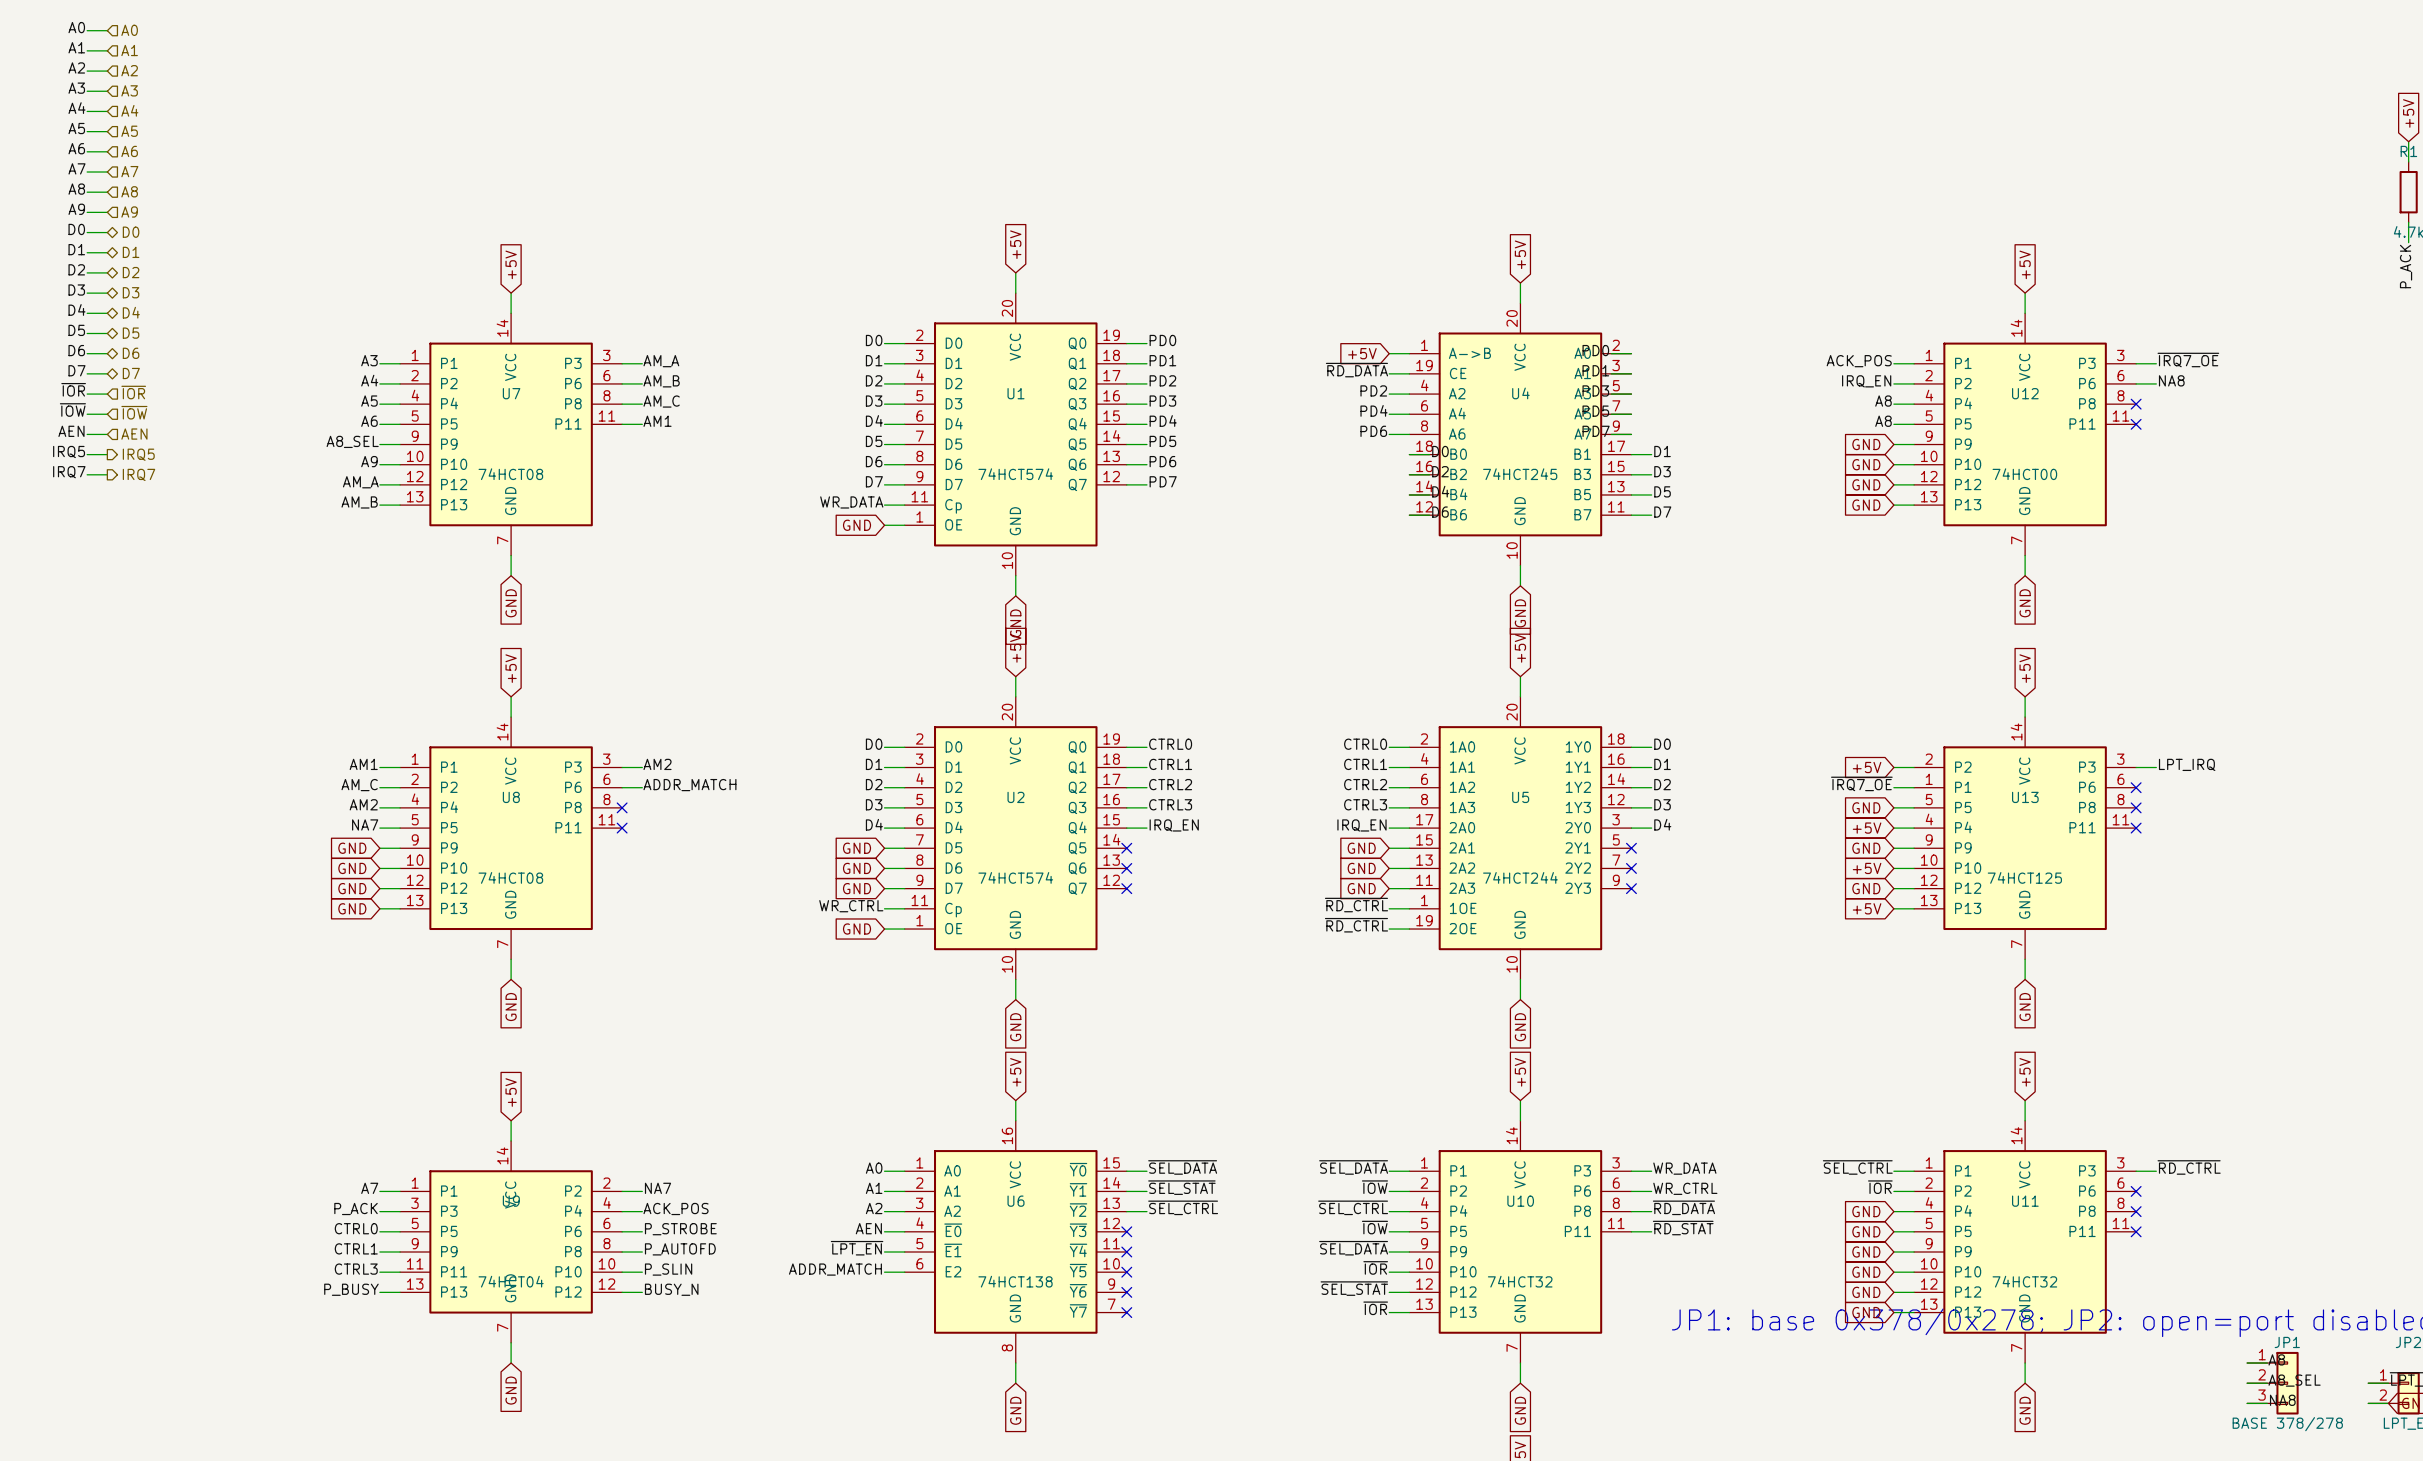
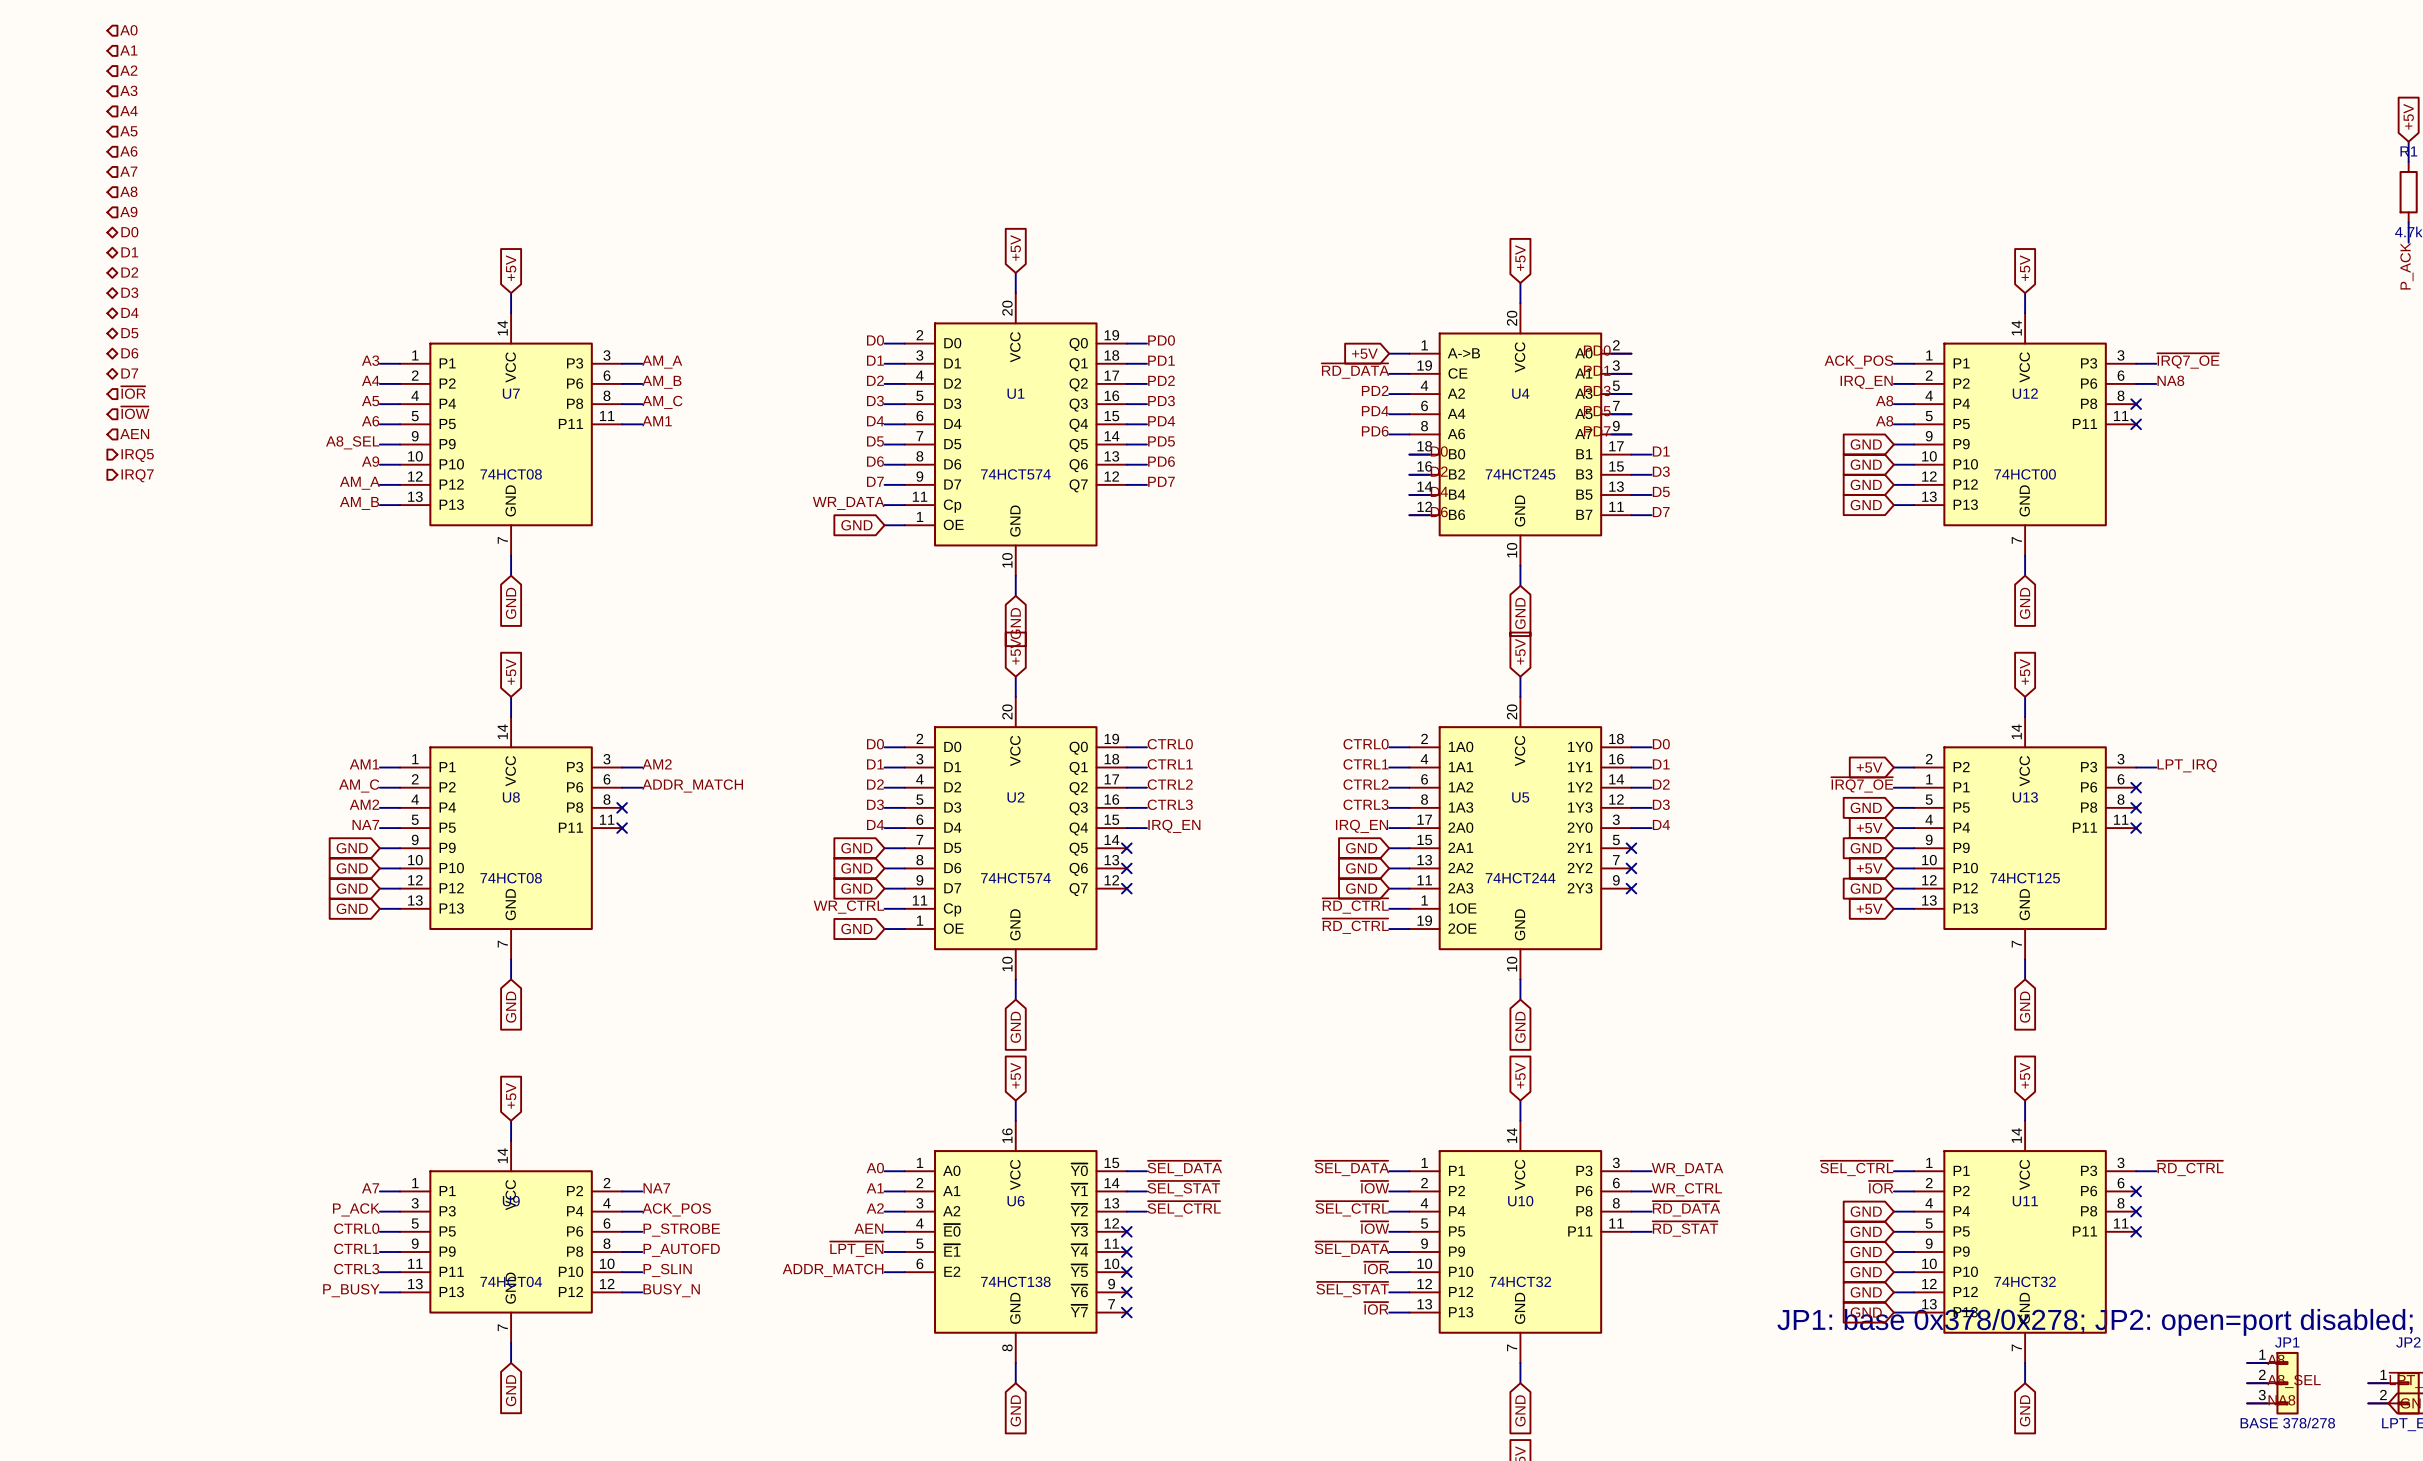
label: A0 (76, 27) -> none
wire: (87, 30) (107, 30) -> none
label: A1 (76, 47) -> none
wire: (87, 50) (107, 50) -> none
label: A2 (76, 67) -> none
wire: (87, 71) (107, 71) -> none
label: A3 (76, 88) -> none
wire: (87, 91) (107, 91) -> none
label: A4 (76, 108) -> none
wire: (87, 111) (107, 111) -> none
label: A5 (76, 128) -> none
wire: (87, 131) (107, 131) -> none
label: A6 (76, 148) -> none
wire: (87, 151) (107, 151) -> none
label: A7 (76, 168) -> none
wire: (87, 172) (107, 172) -> none
label: A8 (76, 189) -> none
wire: (87, 192) (107, 192) -> none
label: A9 (76, 209) -> none
wire: (87, 212) (107, 212) -> none
label: D0 (76, 229) -> none
wire: (87, 232) (107, 232) -> none
label: D1 (76, 249) -> none
wire: (87, 252) (107, 252) -> none
label: D2 (76, 269) -> none
wire: (87, 272) (107, 272) -> none
label: D3 (76, 290) -> none
wire: (87, 293) (107, 293) -> none
label: D4 (76, 309) -> none
wire: (87, 313) (107, 313) -> none
label: D5 (76, 330) -> none
wire: (87, 333) (107, 333) -> none
label: D6 (76, 350) -> none
wire: (87, 353) (107, 353) -> none
label: D7 (76, 370) -> none
wire: (87, 373) (107, 373) -> none
label: ~{IOR} (73, 389) -> none
wire: (87, 394) (107, 394) -> none
label: ~{IOW} (72, 409) -> none
wire: (87, 414) (107, 414) -> none
label: AEN (71, 431) -> none
wire: (87, 434) (107, 434) -> none
label: IRQ5 (69, 451) -> none
wire: (87, 454) (107, 454) -> none
label: IRQ7 (69, 472) -> none
wire: (87, 474) (107, 474) -> none

